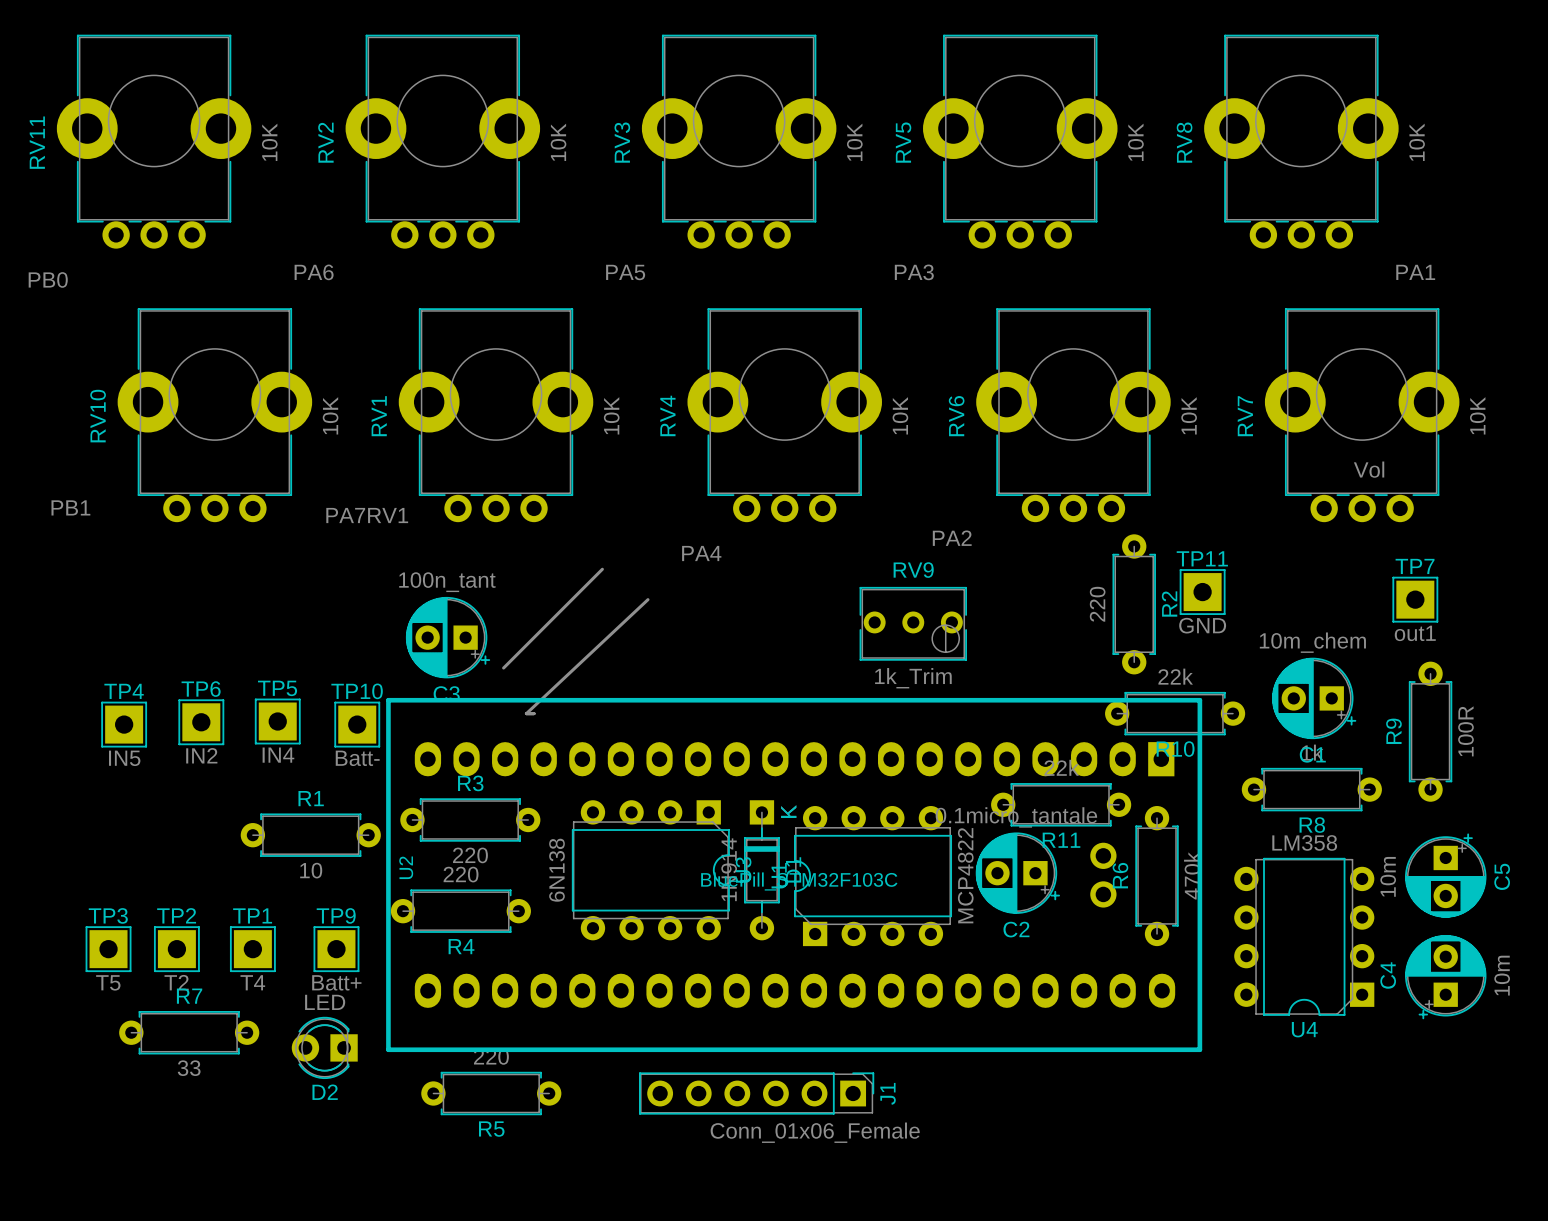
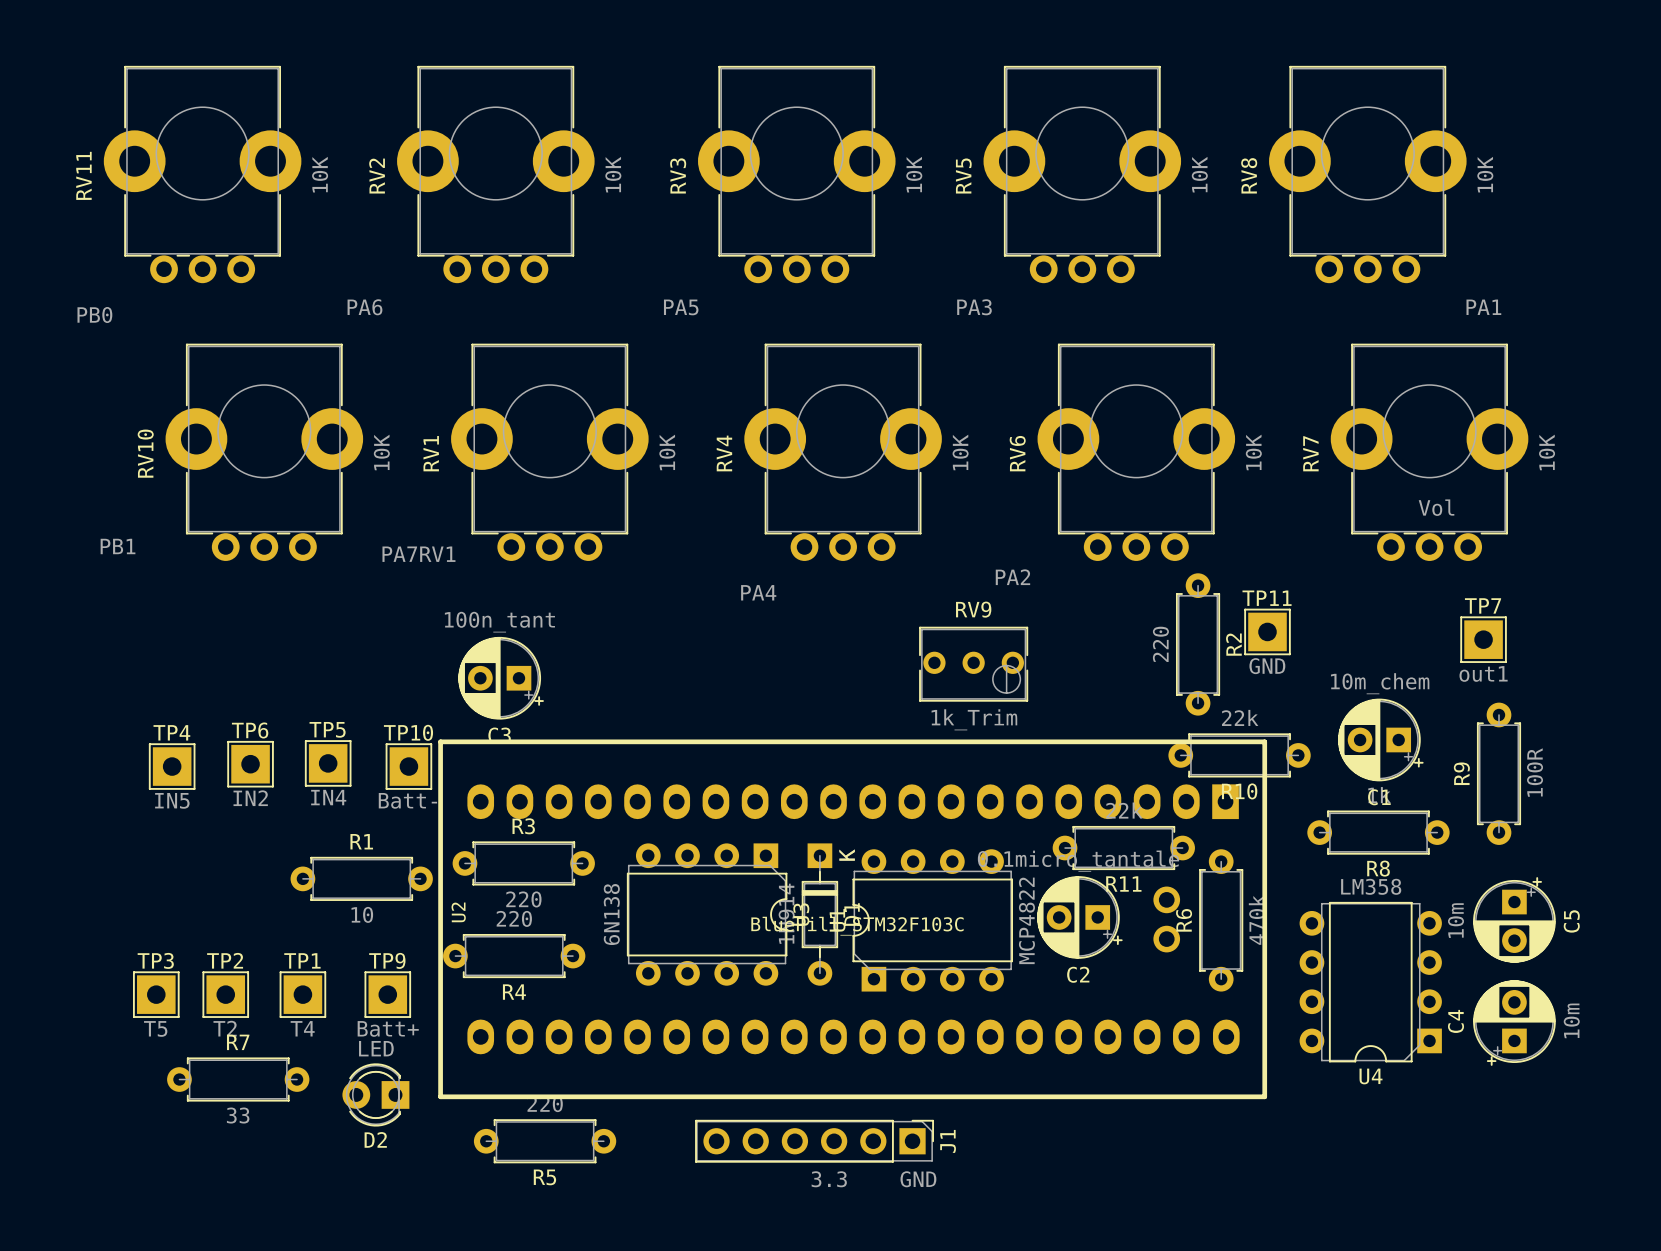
line: (602, 569) (503, 668) -> none
line: (647, 599) (526, 713) (534, 713) -> none
J1 value: Conn_01x06_Female (815, 1132) -> 3.3 GND (874, 1179)

